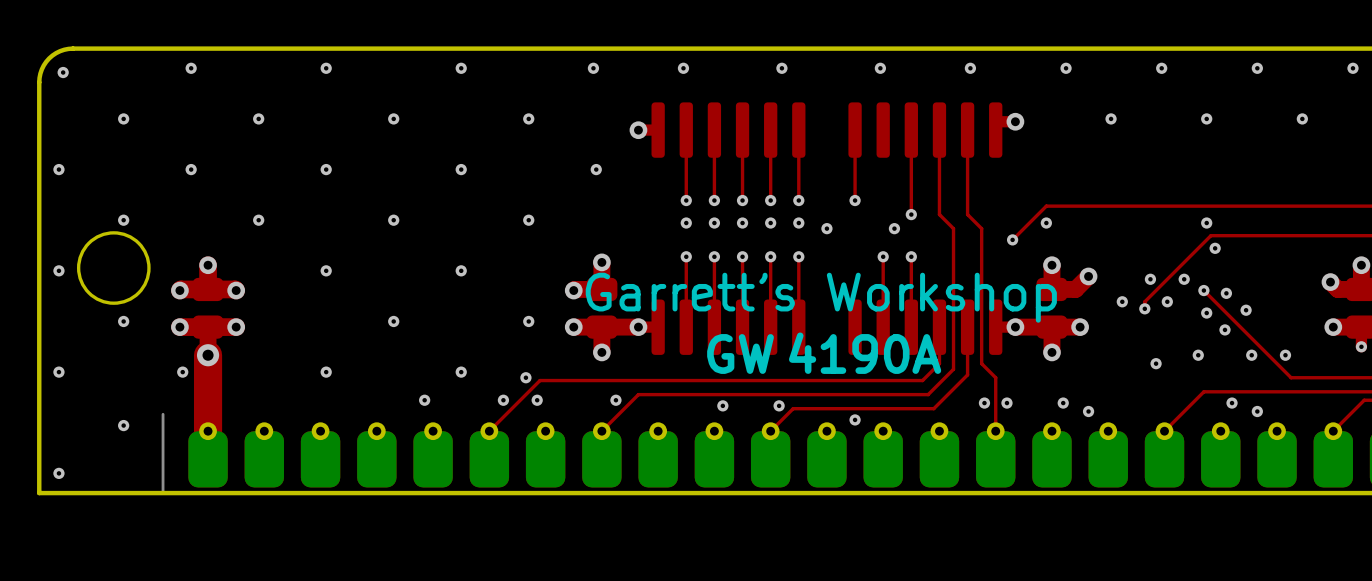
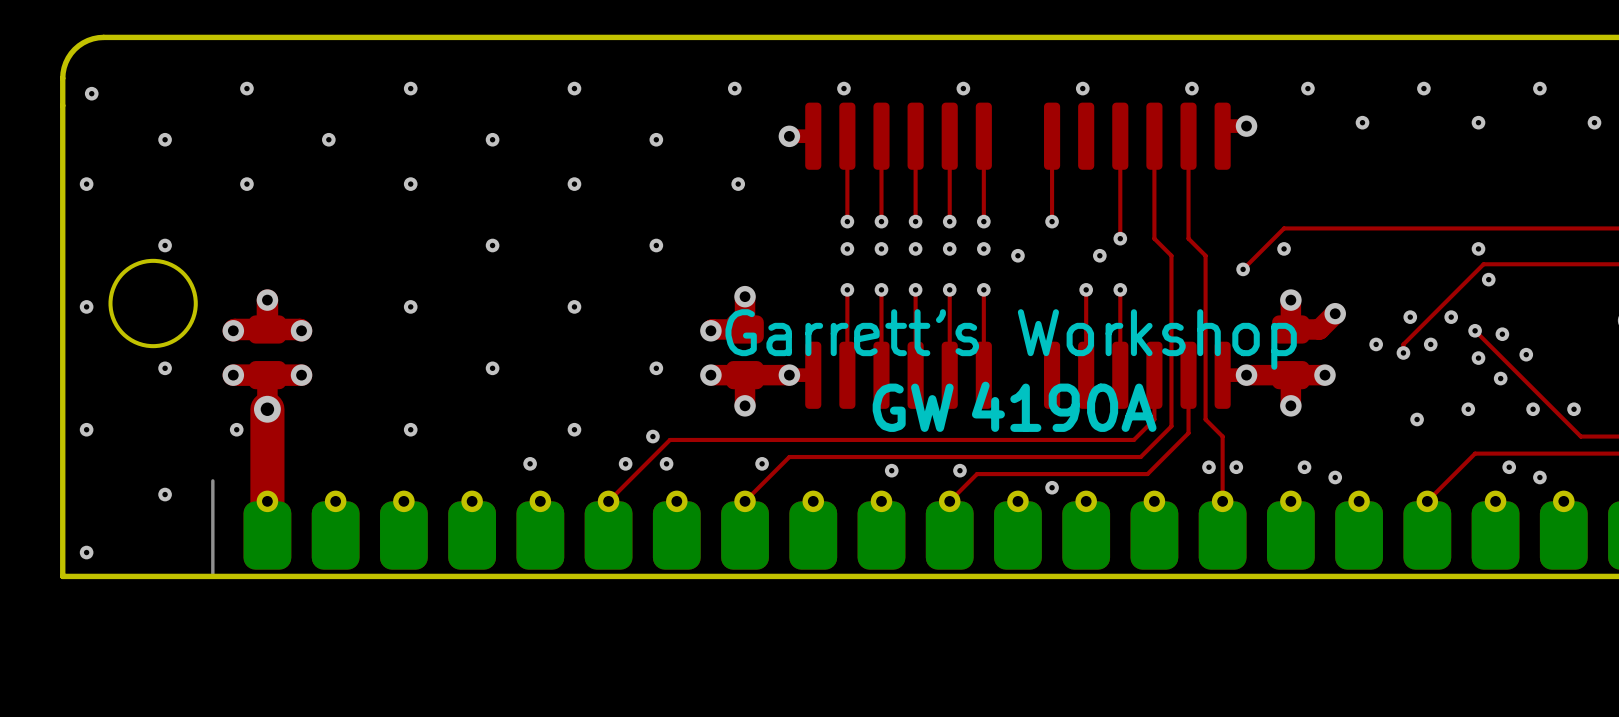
via position: (191, 68) -> (246, 88)
via position: (326, 68) -> (410, 88)
via position: (461, 68) -> (574, 88)
via position: (593, 68) -> (734, 88)
via position: (683, 68) -> (843, 88)
via position: (781, 68) -> (963, 88)
via position: (880, 68) -> (1082, 88)
via position: (970, 68) -> (1191, 88)
via position: (1066, 68) -> (1307, 88)
via position: (1161, 68) -> (1423, 88)
via position: (1257, 68) -> (1539, 88)
via position: (63, 72) -> (91, 93)
via position: (123, 118) -> (165, 139)
via position: (258, 118) -> (328, 139)
via position: (393, 118) -> (492, 139)
via position: (528, 118) -> (656, 139)
via: (258, 220) -> none

